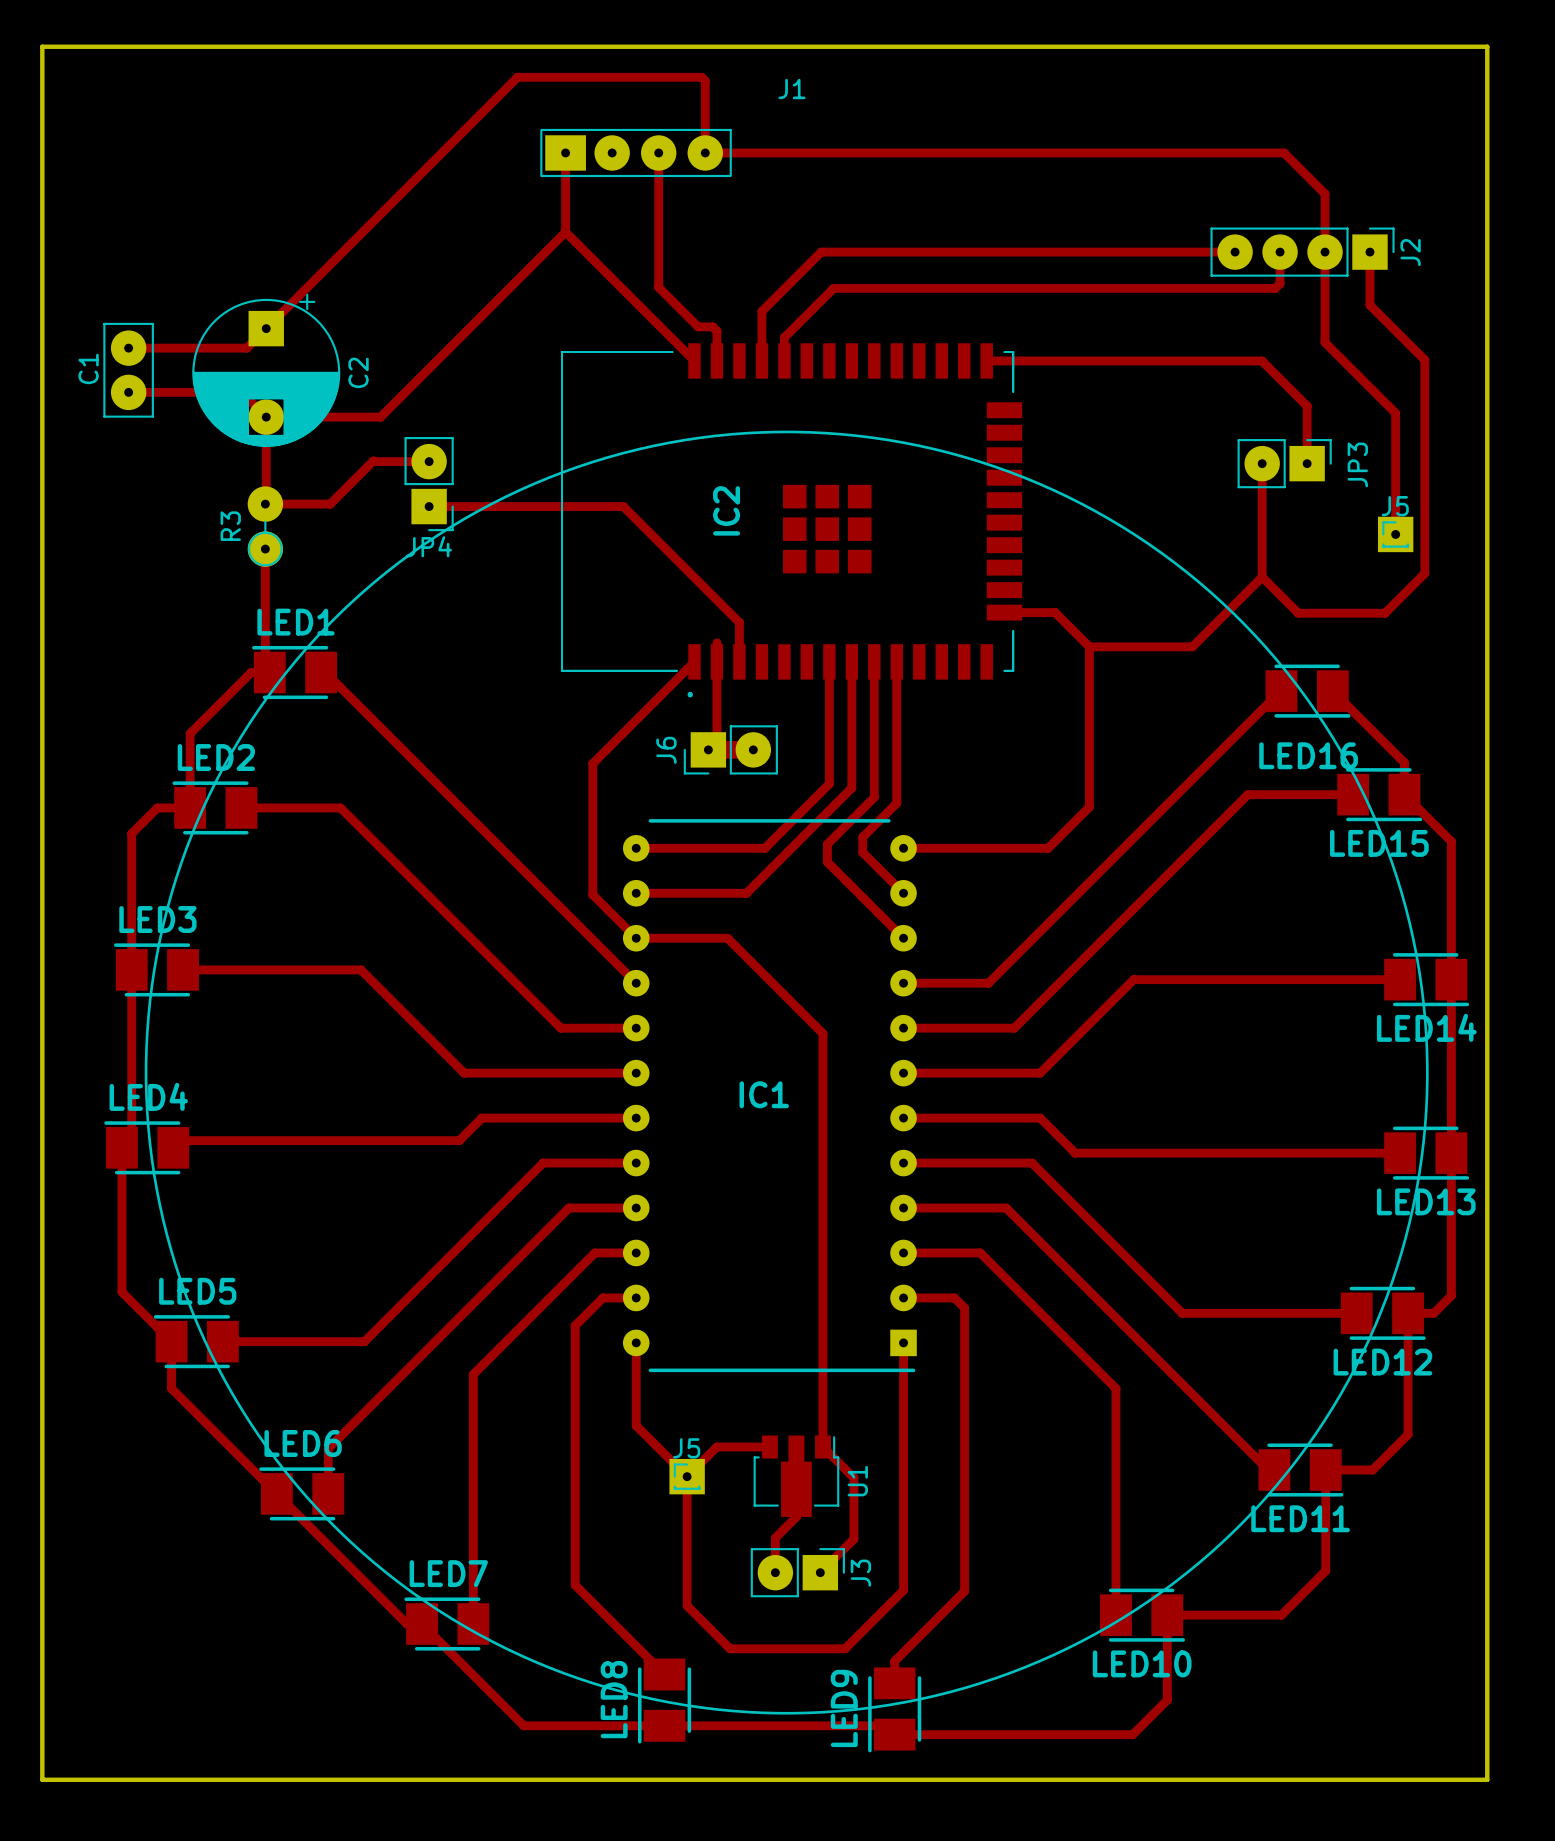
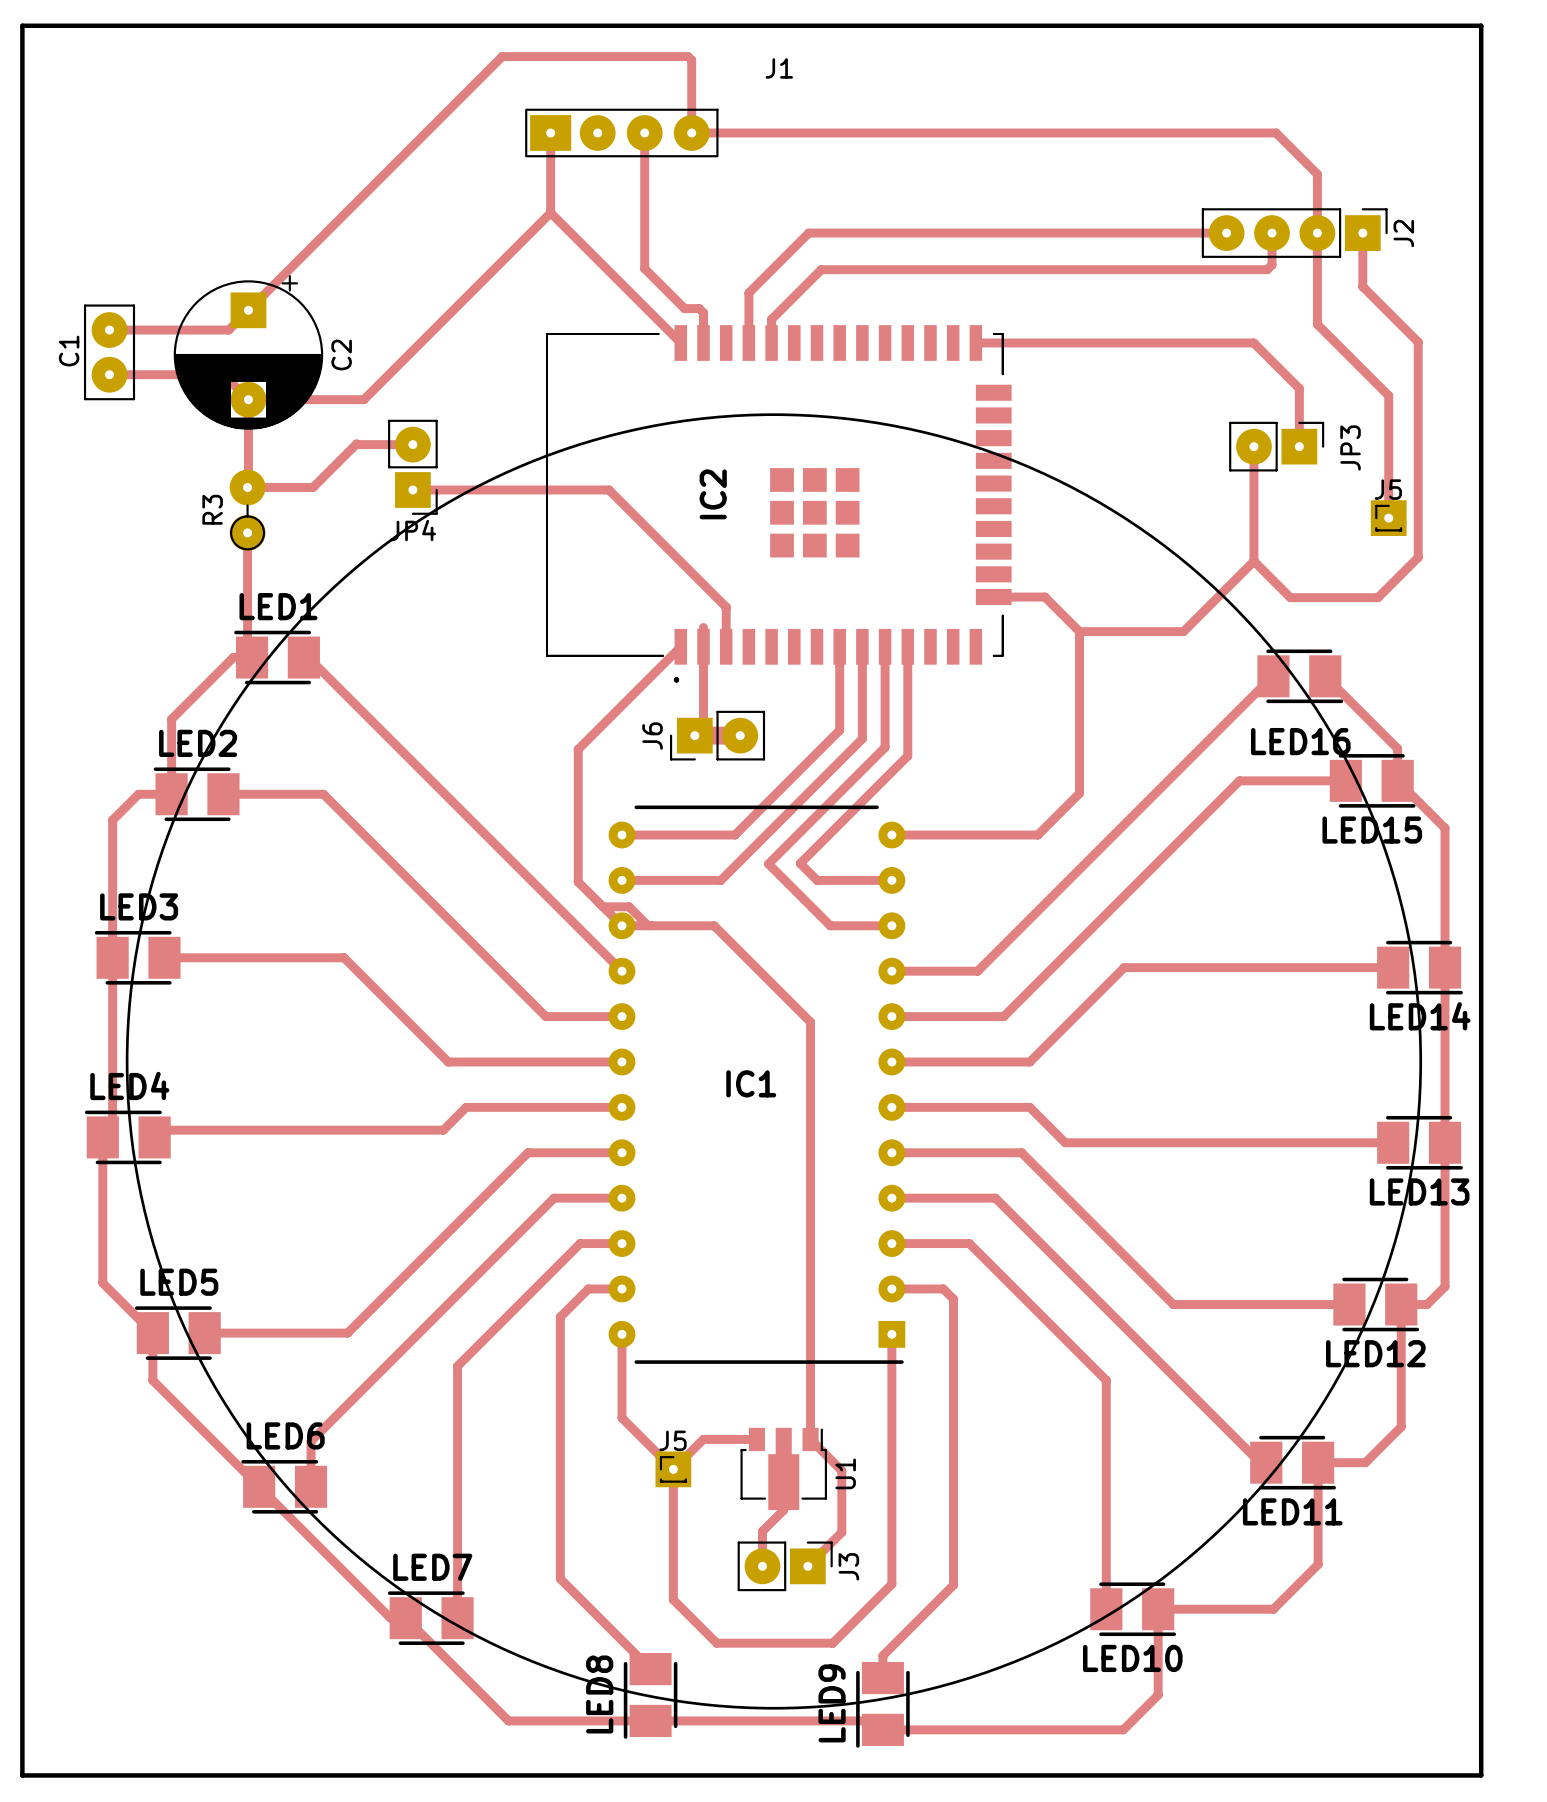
track: (829, 661) (829, 783) (764, 848) (748, 848) -> (839, 730) (734, 835)
track: (851, 744) (851, 787) (746, 893) (734, 893) -> (862, 738) (720, 880)
track: (874, 753) (874, 797) (827, 844) (827, 862) (903, 938) -> (885, 747) (768, 863) (830, 925) (891, 925)
track: (896, 761) (896, 803) (862, 837) (862, 852) (903, 893) -> (907, 646) (907, 756) (800, 863) (817, 880) (891, 880)
track: none -> (603, 906) (629, 906) (648, 925)

